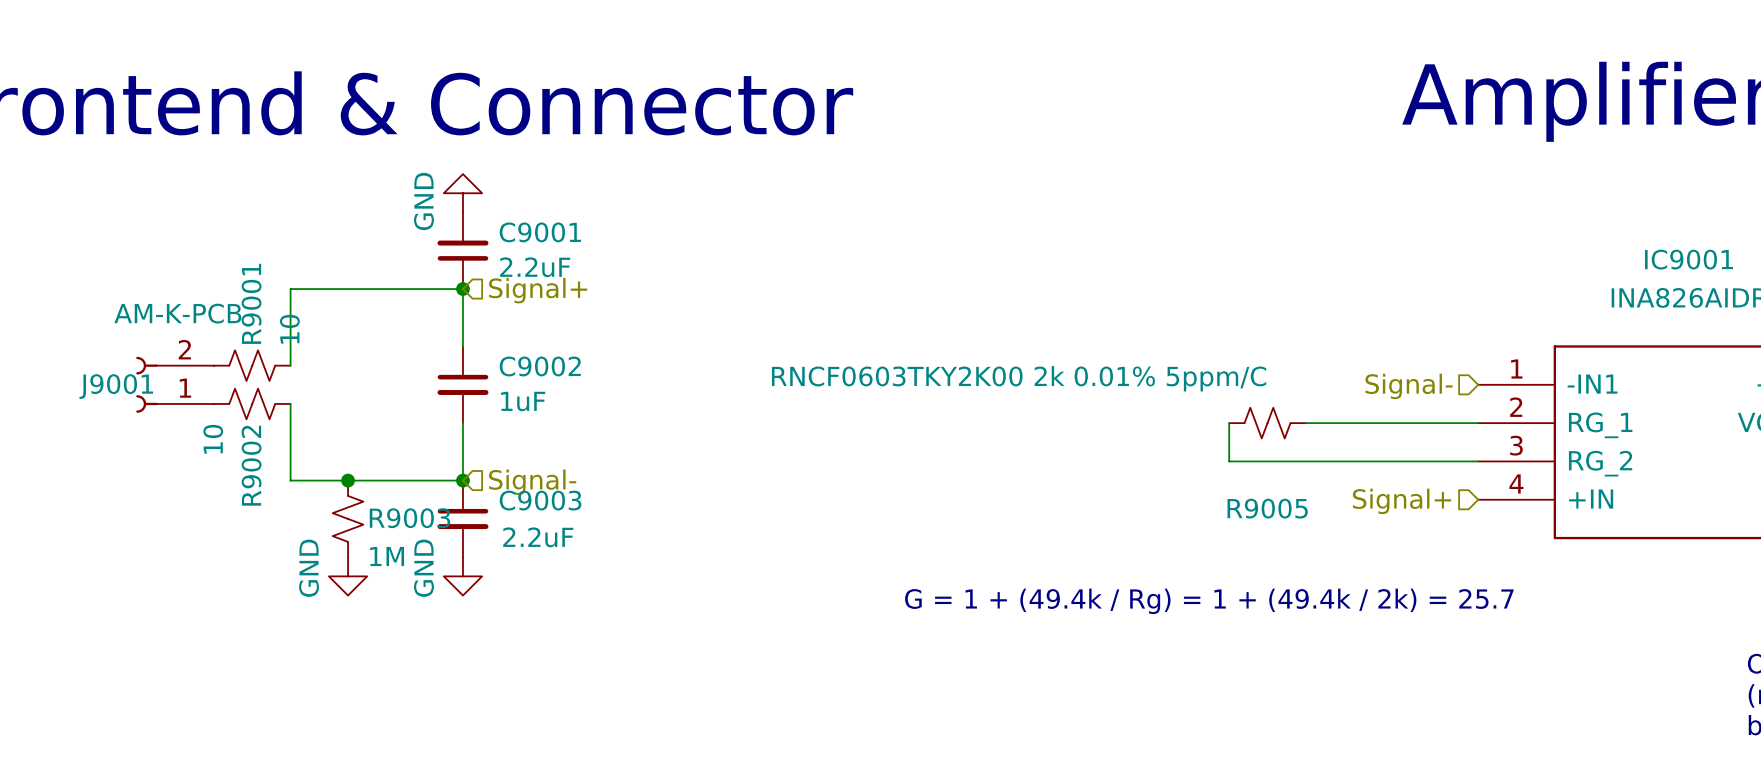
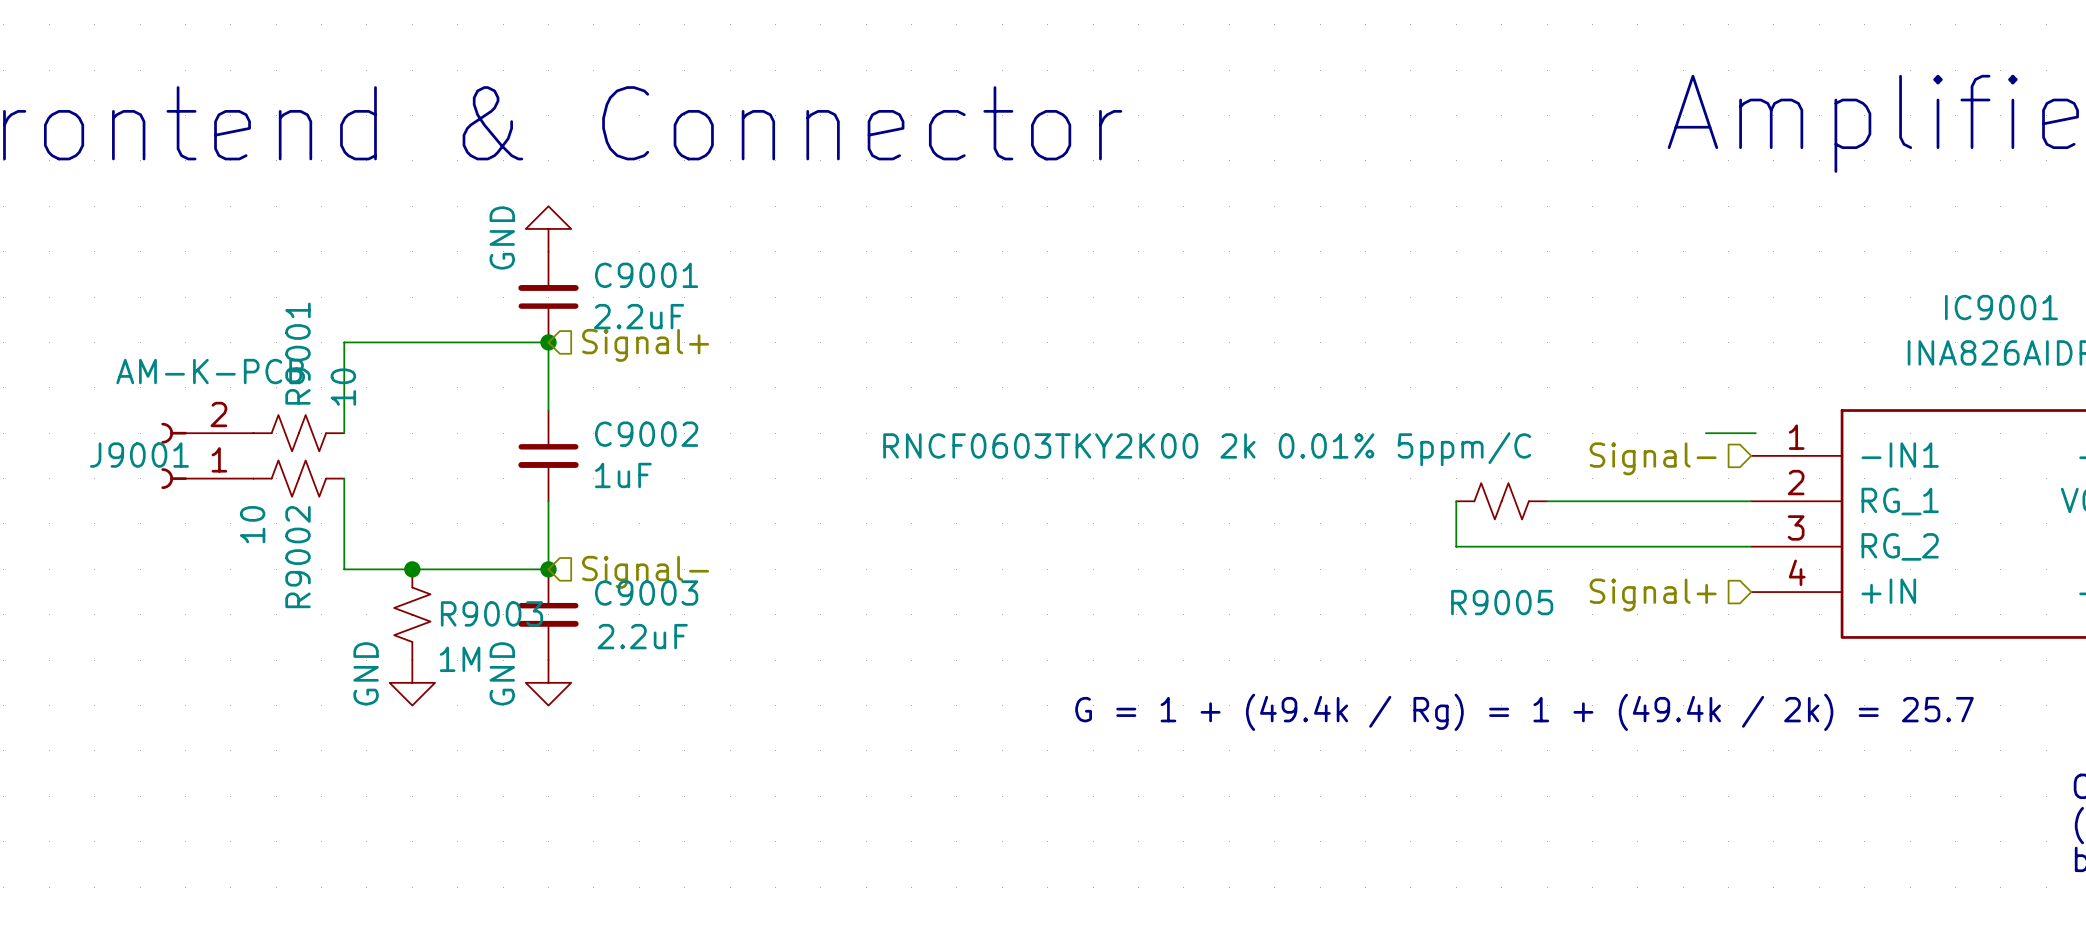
wire: none -> (1705, 433) (1755, 433)

